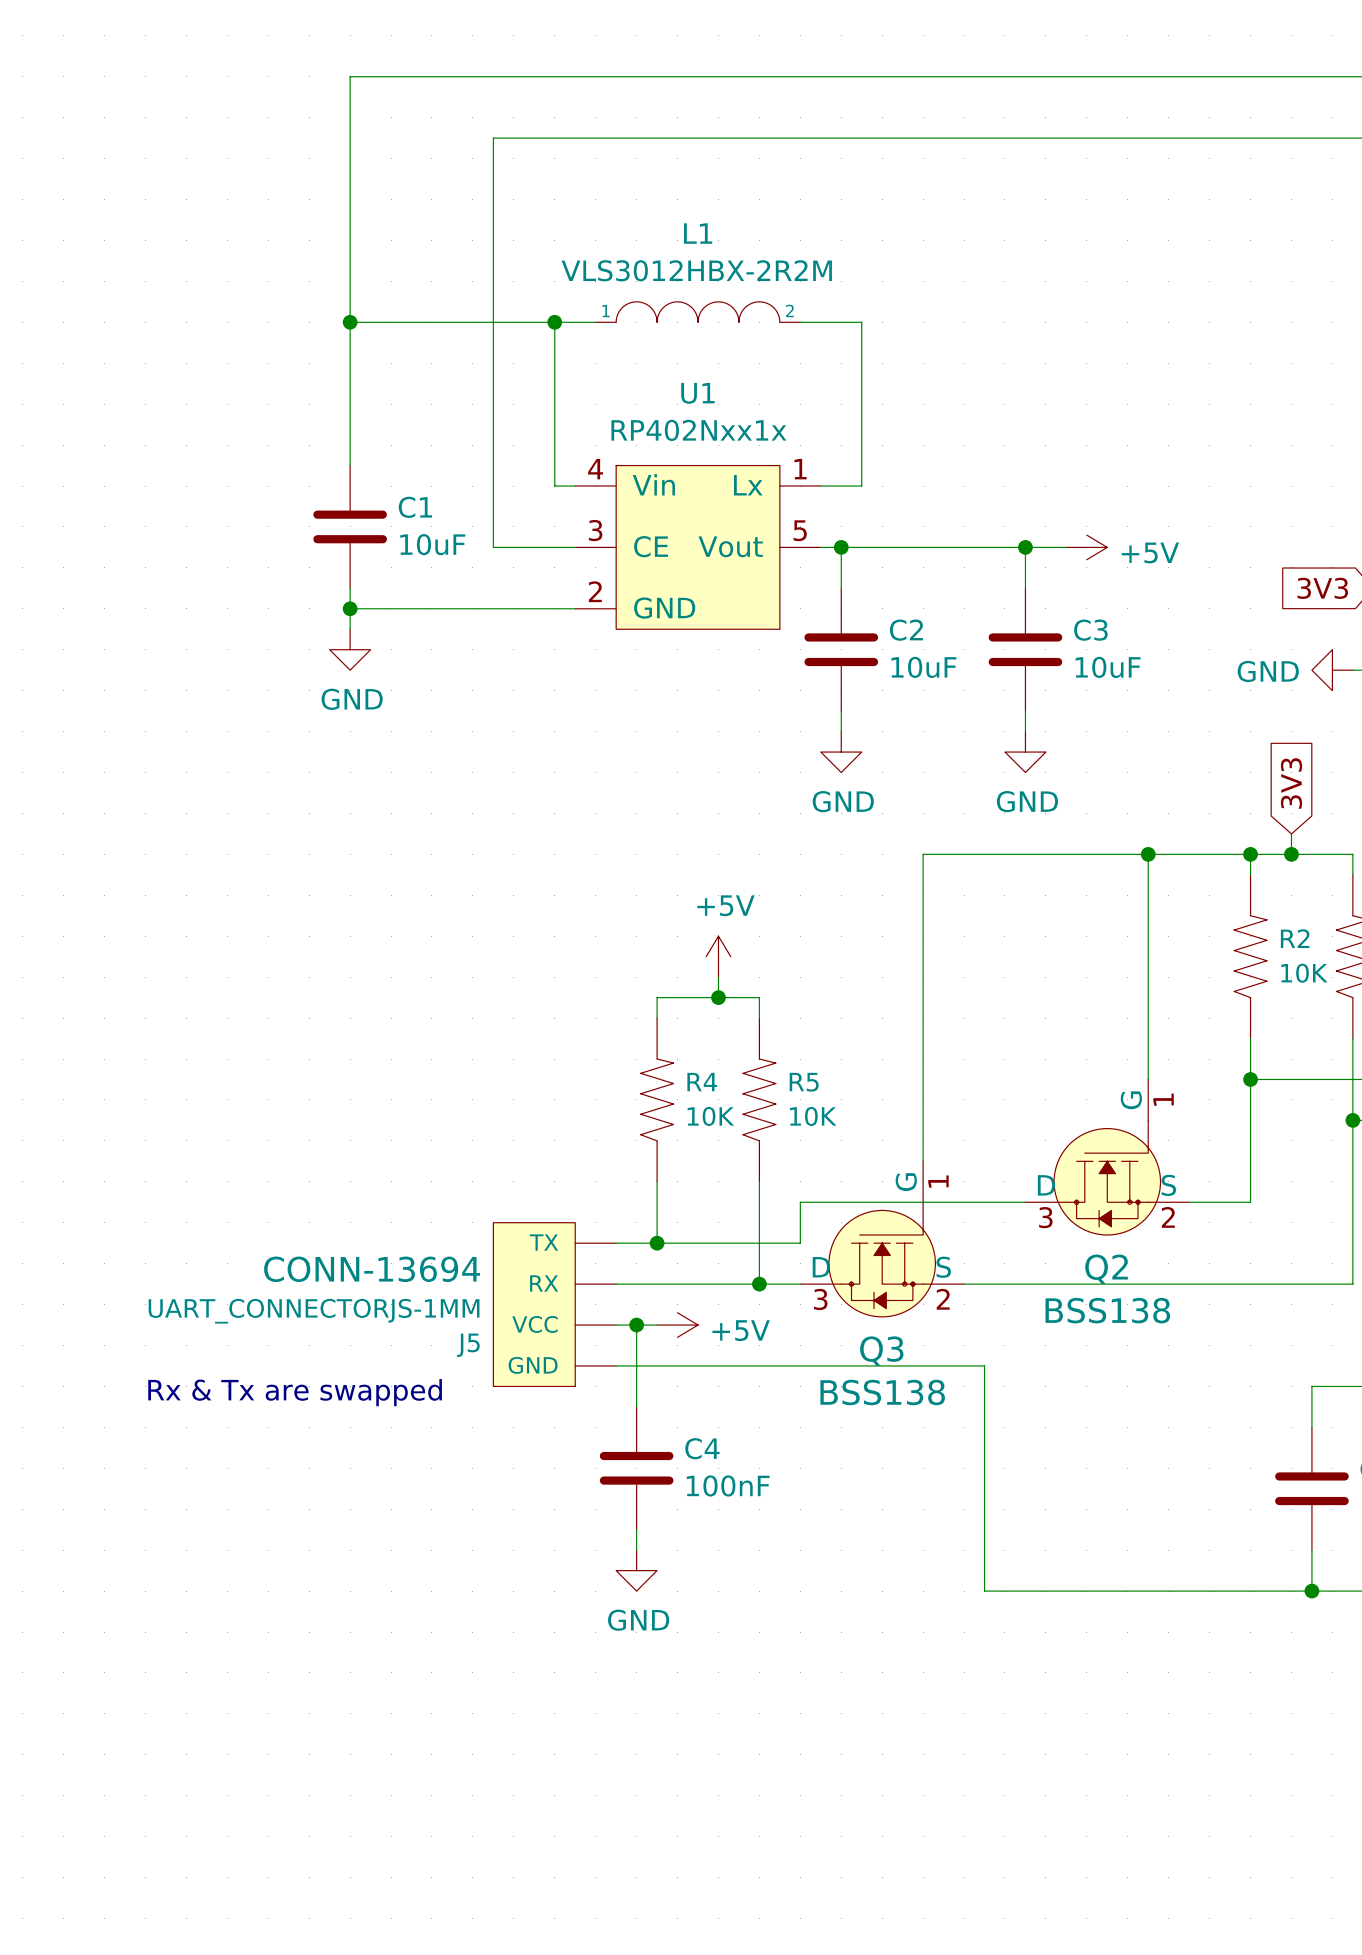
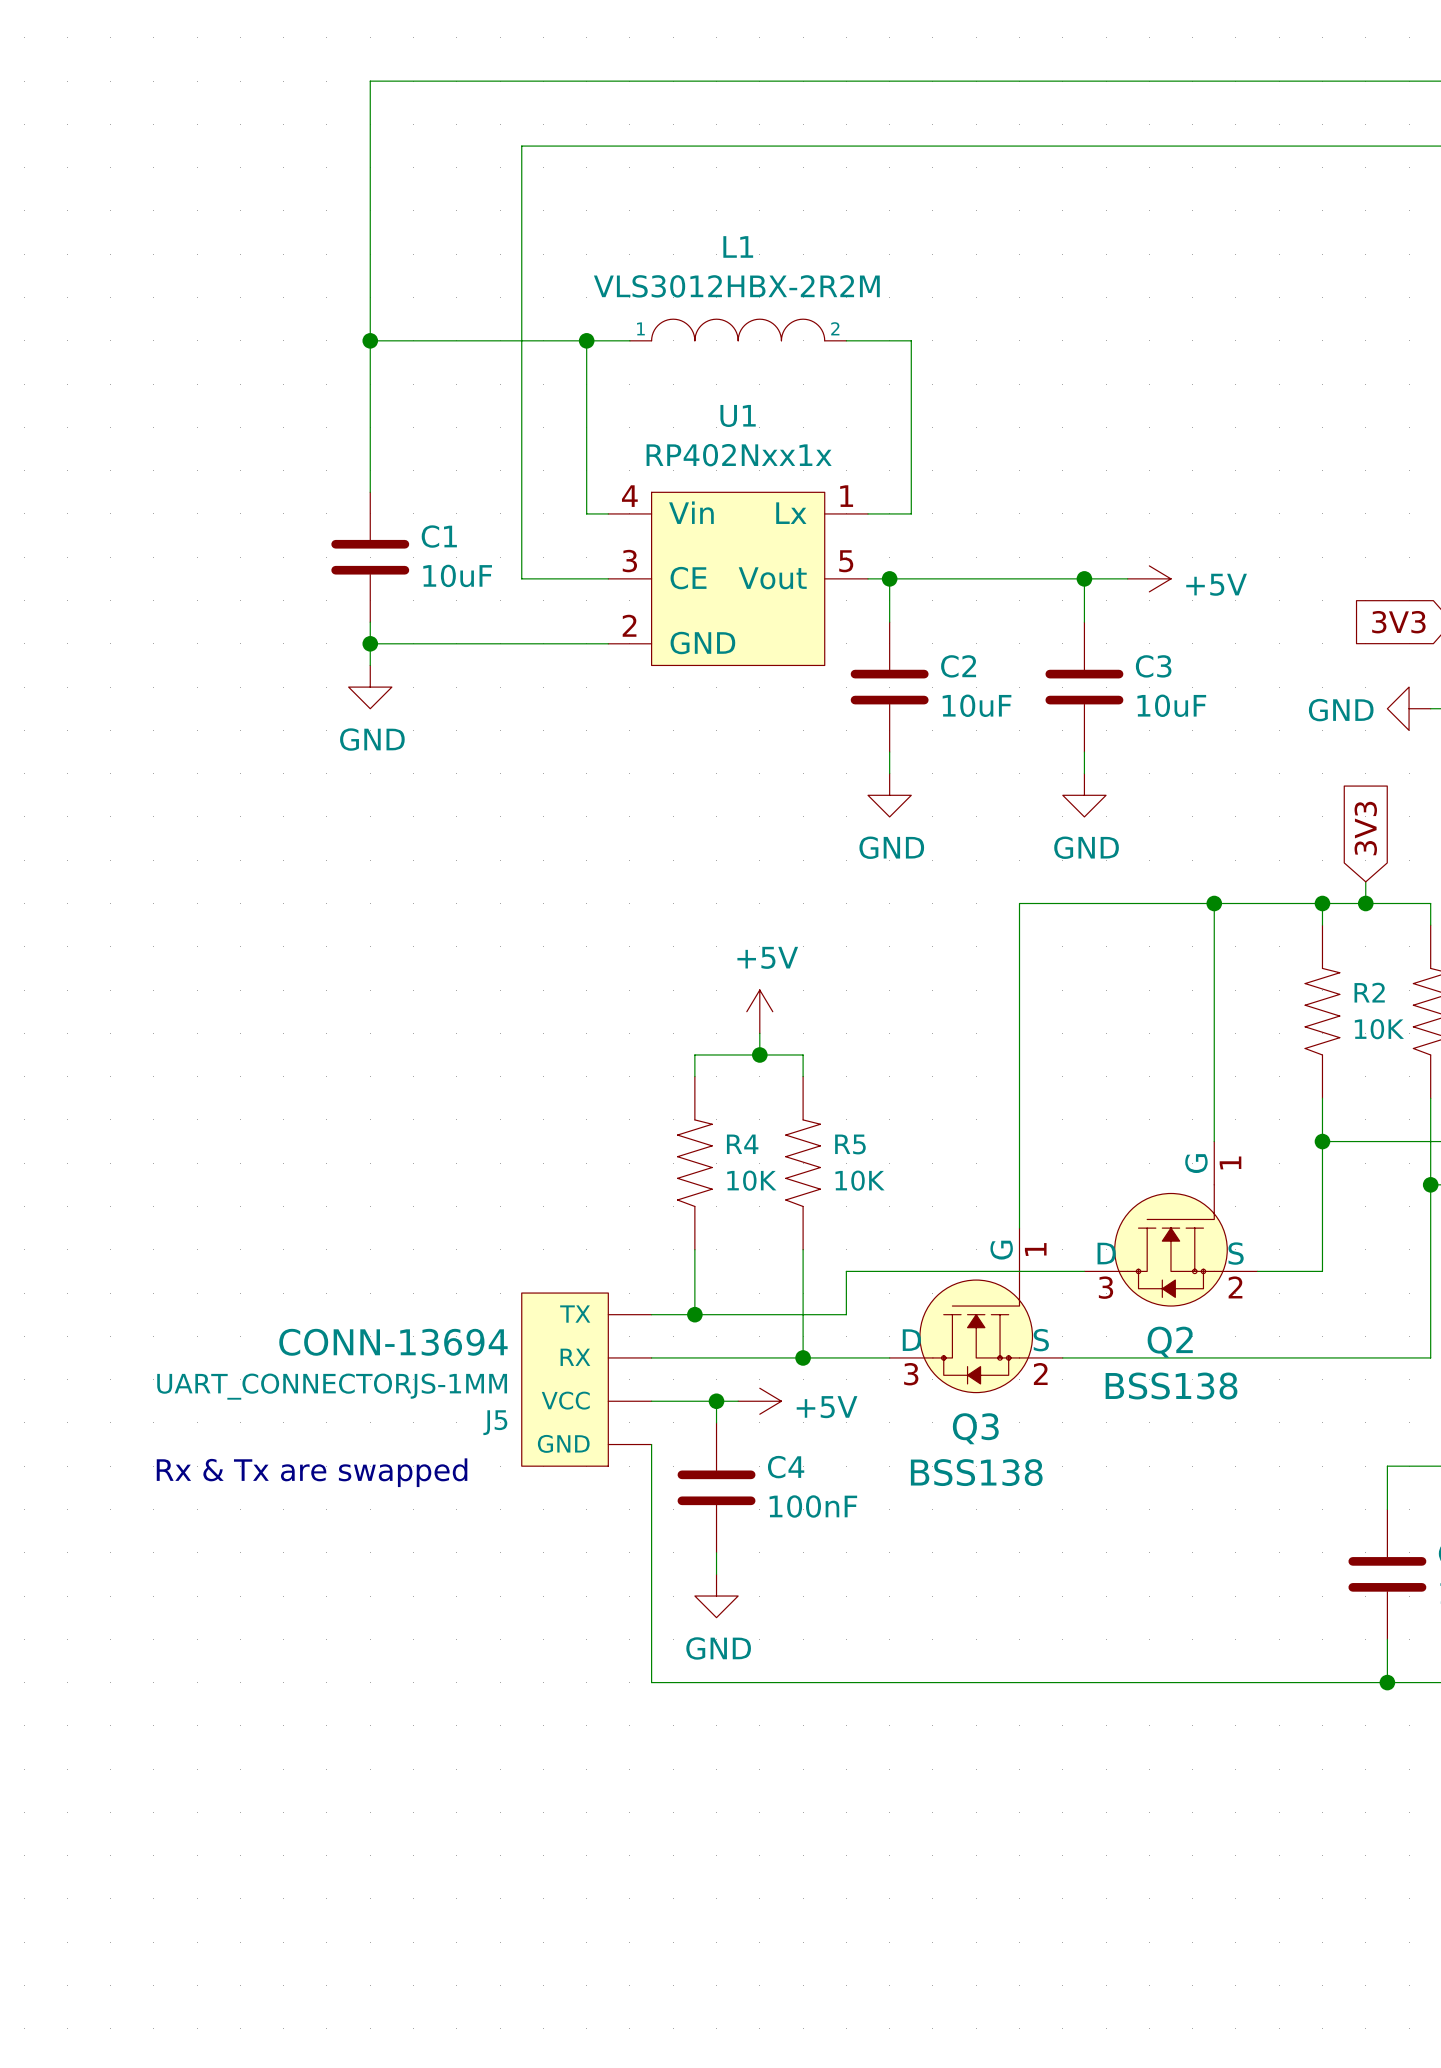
wire: (964, 854) (923, 854) (923, 1161) -> (1019, 903) (1019, 1228)
Q3 position: (882, 1239) -> (976, 1310)
wire: (636, 1325) (636, 1406) -> none
junction position: (636, 1325) -> (716, 1401)
wire: none -> (716, 1401) (716, 1422)
power symbol position: +5V (677, 1325) -> +5V (759, 1401)
wire: (616, 1365) (984, 1365) (984, 1591) -> (651, 1444) (651, 1682) (1041, 1682)
C4 position: (636, 1468) -> (716, 1487)
wire: (636, 1529) (636, 1550) -> (716, 1552) (716, 1574)
power symbol position: GND (636, 1570) -> GND (716, 1596)

